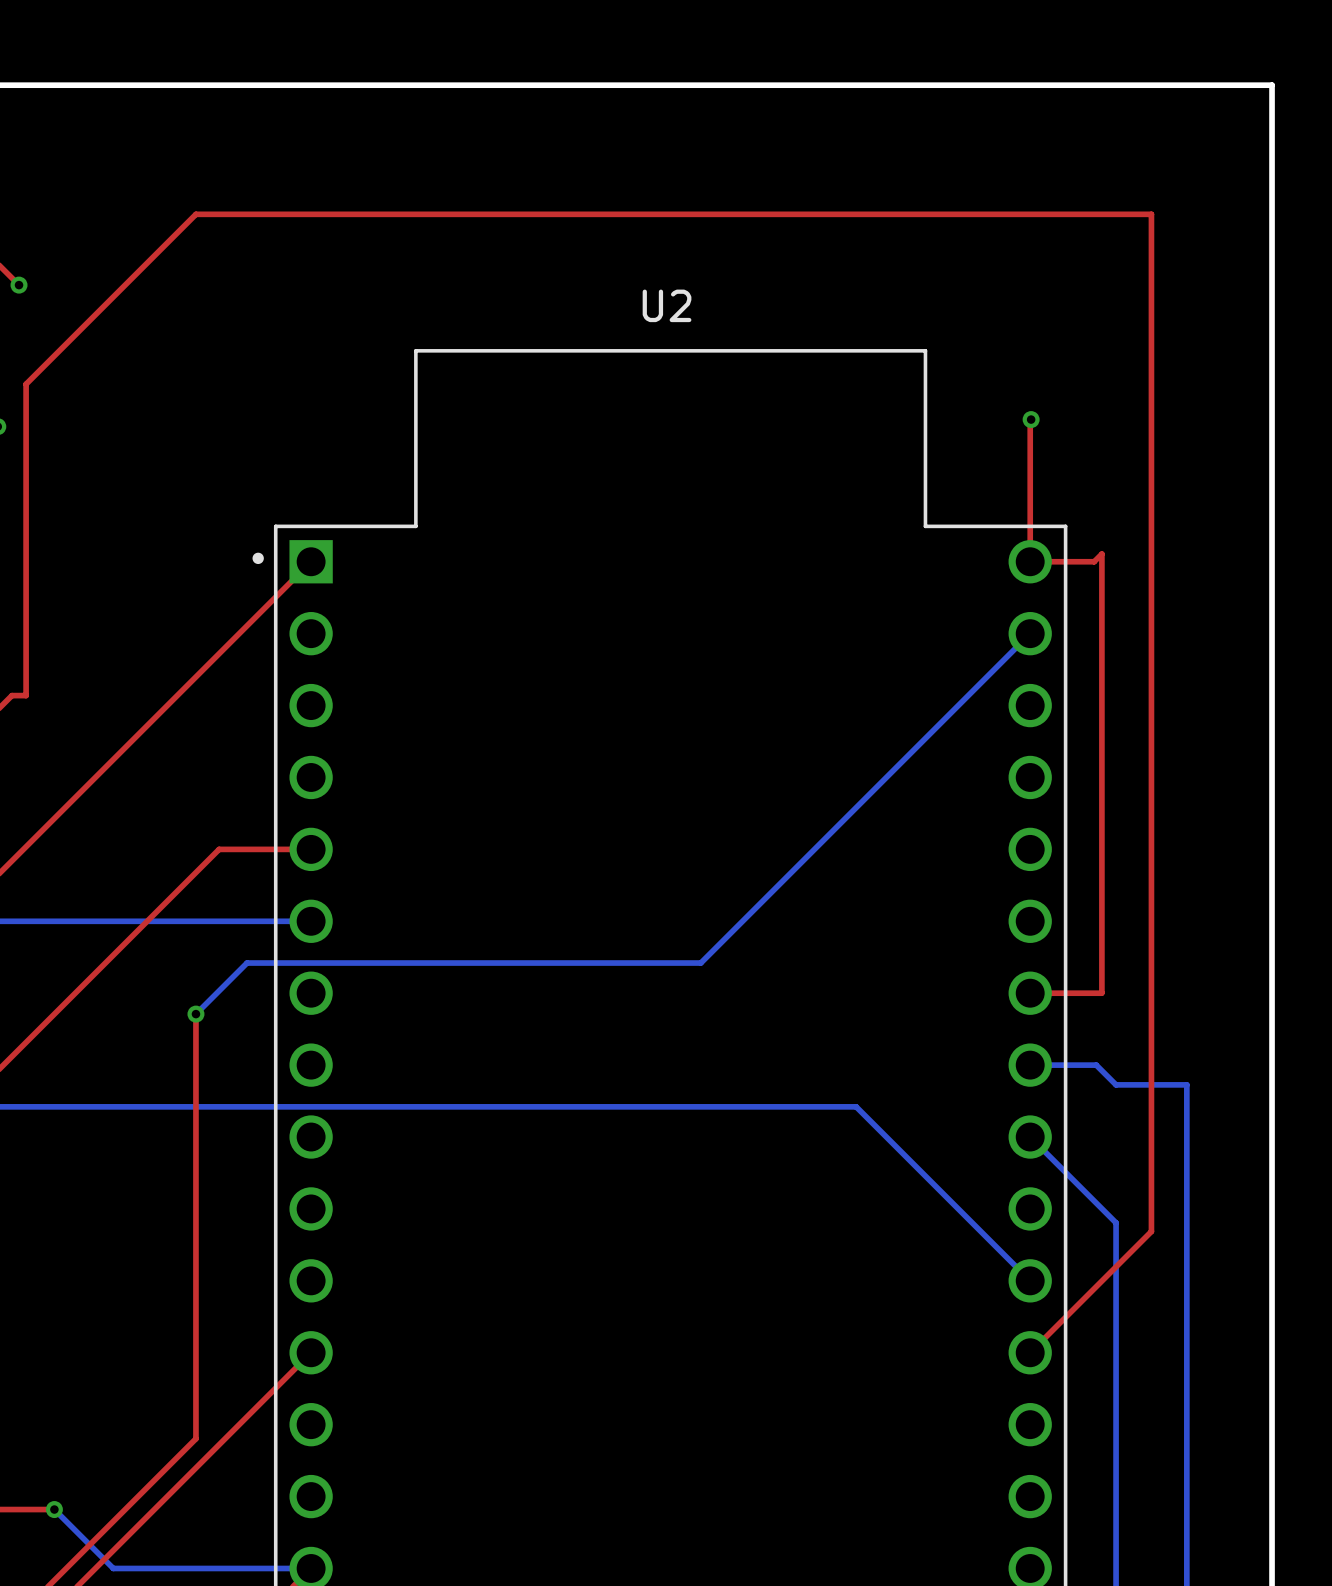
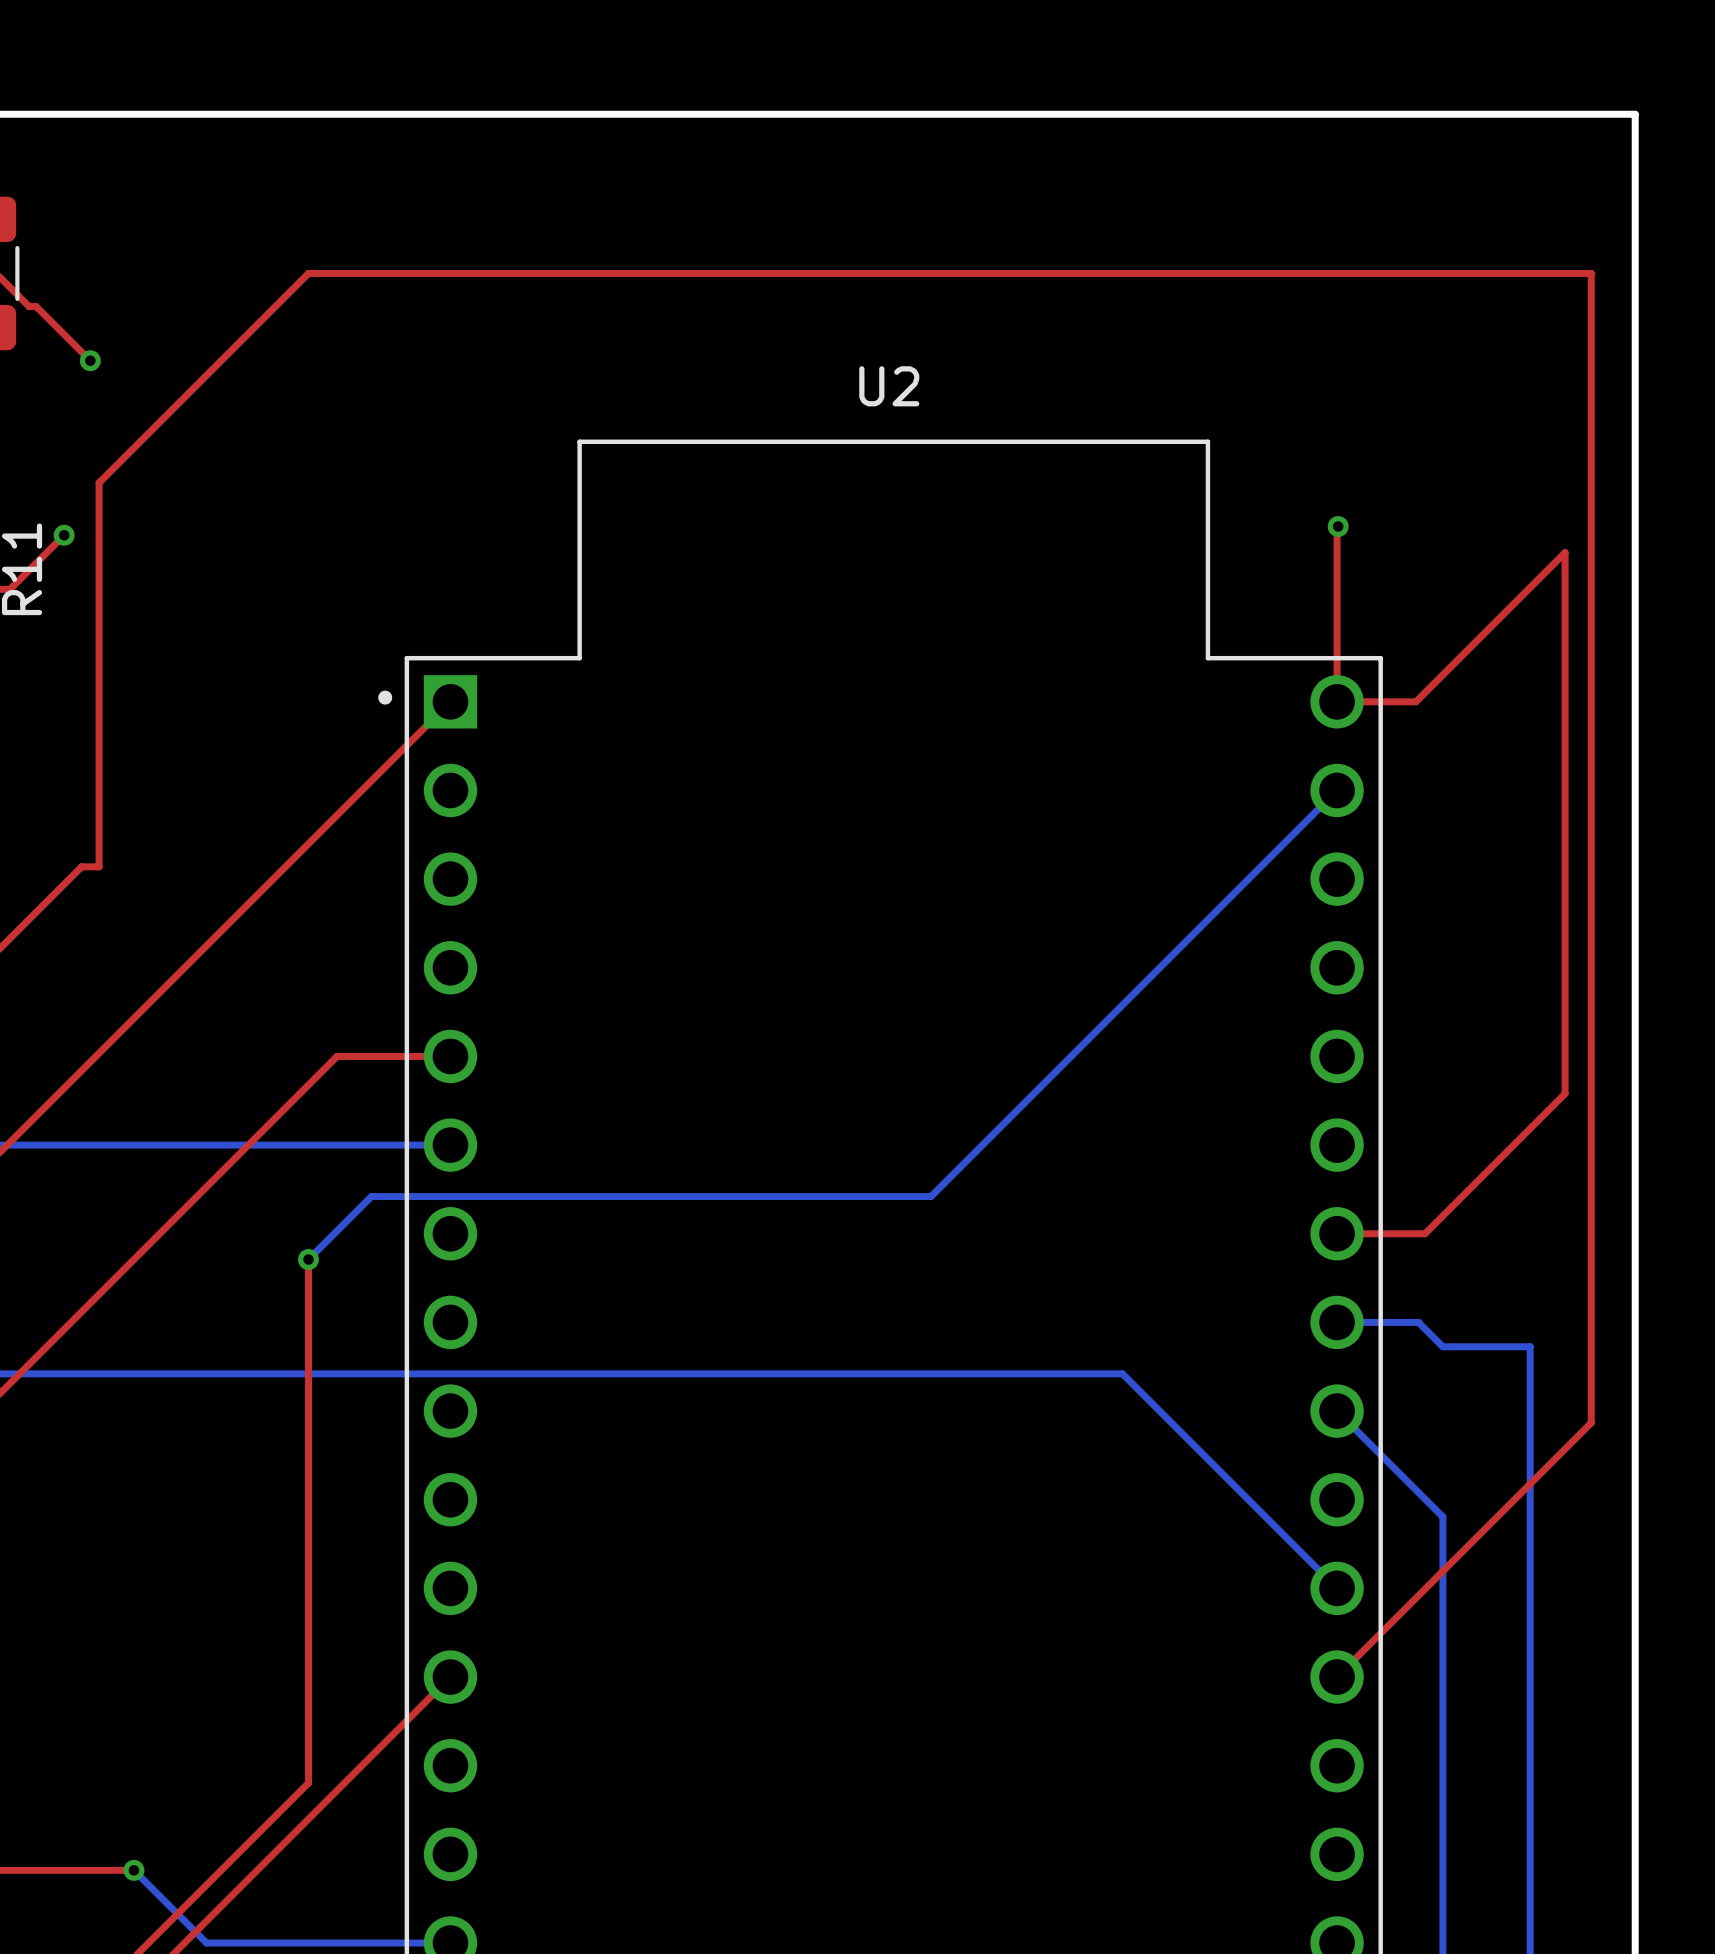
top track: (1151, 214) (1151, 1231) -> (1486, 273) (1591, 273) (1591, 1422) (1486, 1527)
top track: (1101, 554) (1101, 992) -> (1425, 692) (1565, 552) (1565, 1093) (1425, 1233)

